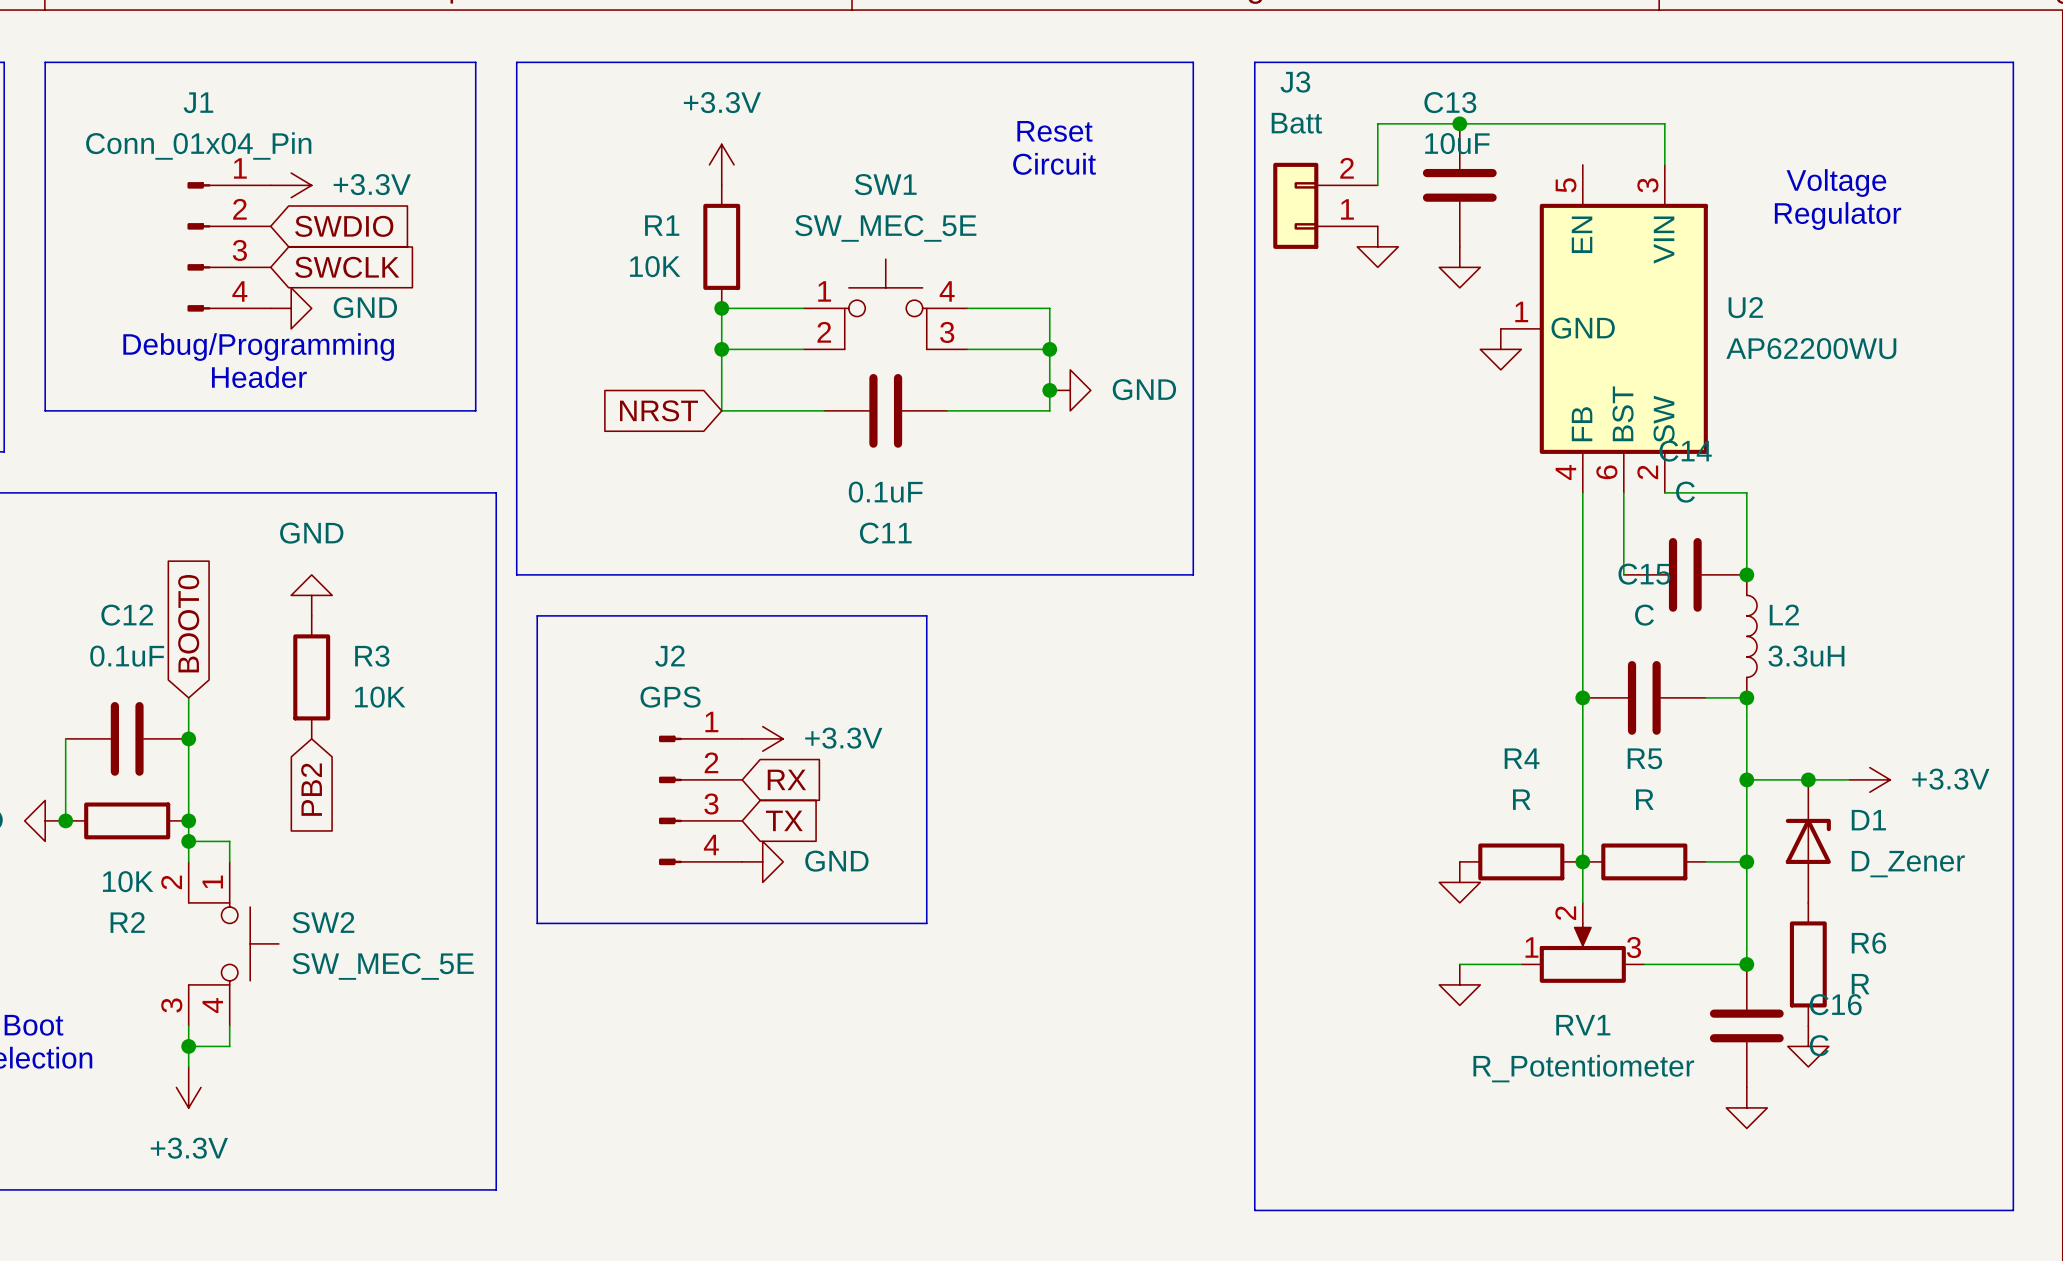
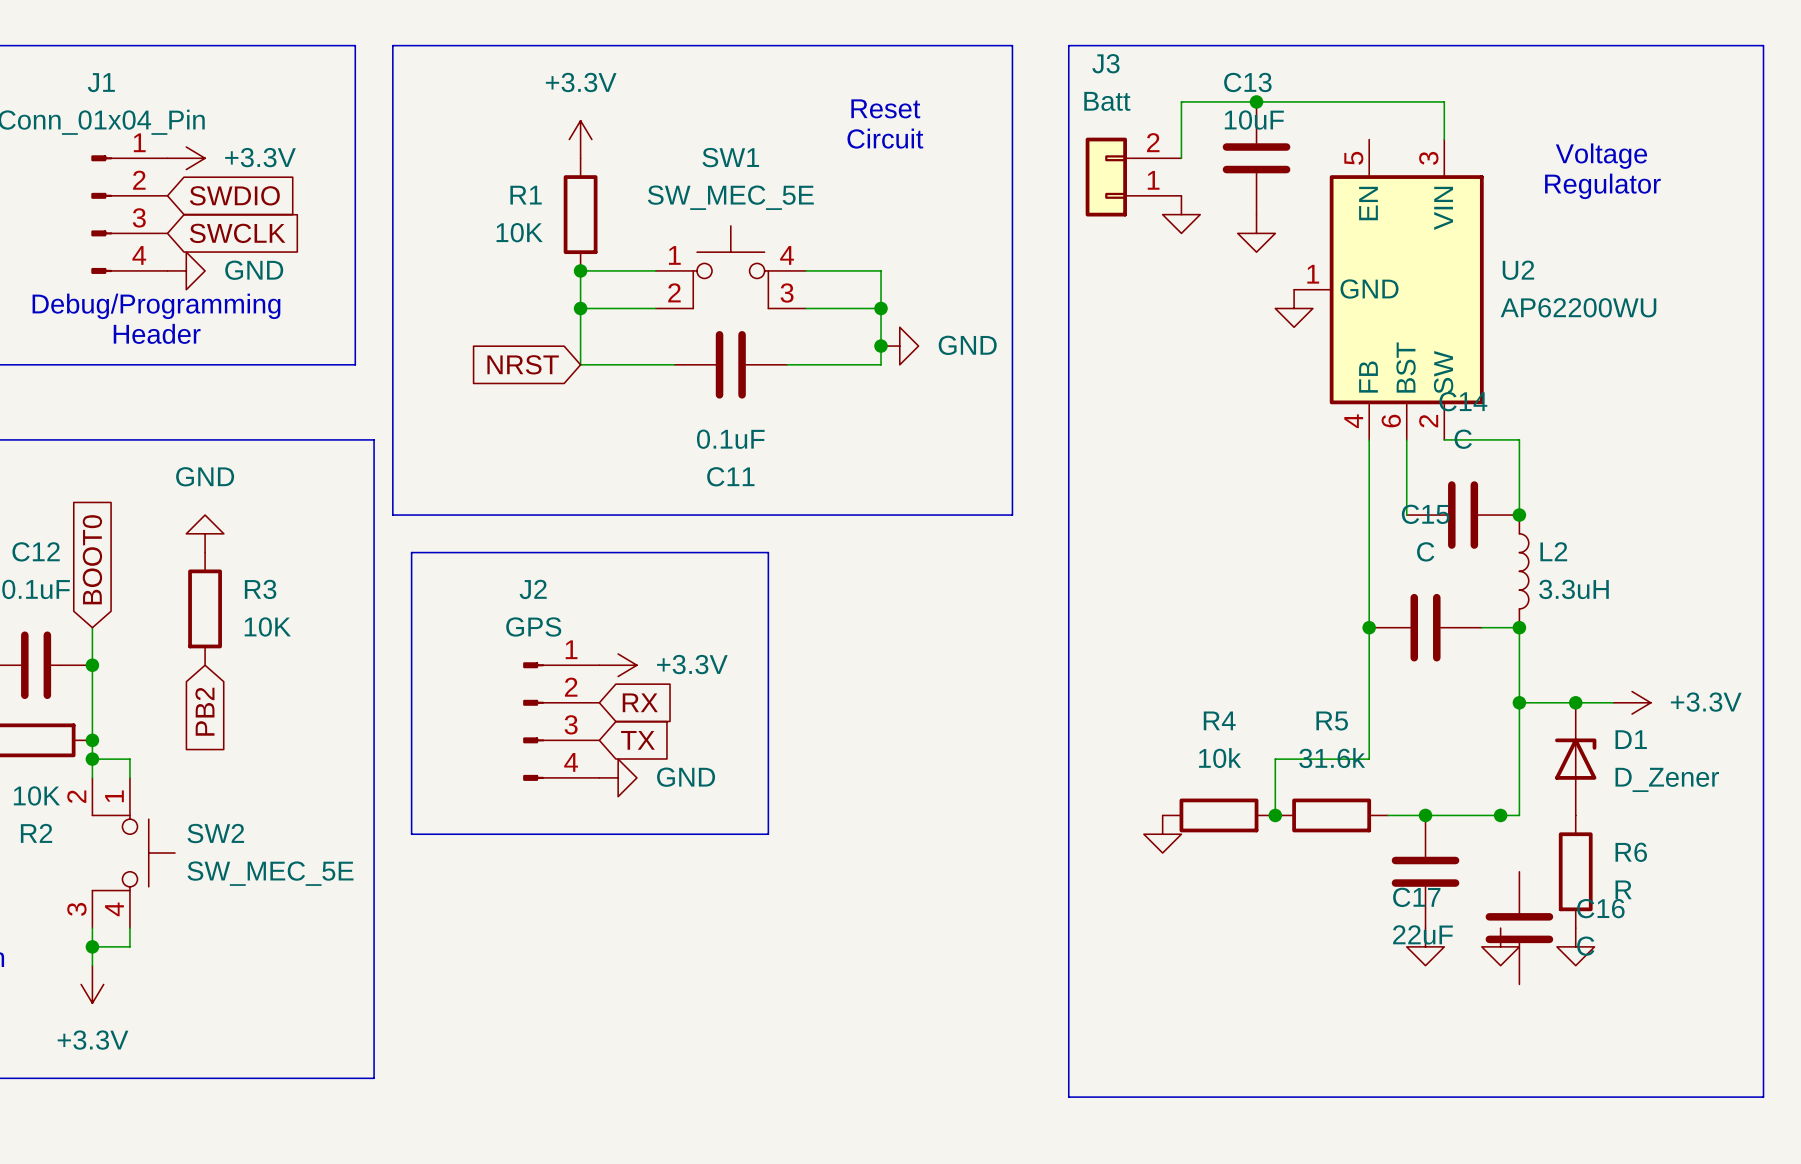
R4 value: R (1521, 799) -> 10k (1220, 758)
R5 value: R (1644, 799) -> 31.6k (1332, 758)
wire: (1582, 841) (1582, 902) -> (1369, 759) (1275, 759) (1275, 815)
R4 position: (1521, 861) -> (1218, 815)
junction: (1582, 861) -> none
R5 position: (1644, 861) -> (1331, 815)
wire: (1705, 861) (1746, 861) -> none
junction: (1746, 861) -> none
power symbol: (1459, 882) -> none
junction: none -> (1275, 815)
junction: none -> (1425, 815)
junction: none -> (1500, 815)
wire: (1746, 902) (1746, 964) (1644, 964) -> (1519, 815) (1387, 815)
power symbol: none -> (1162, 834)
RV1: R_Potentiometer (1582, 942) -> none
wire: (1459, 964) (1521, 964) -> none
C17: none -> 22uF (1425, 871)
junction: (1746, 964) -> none
power symbol: (1459, 984) -> none
power symbol: none -> (1425, 946)
power symbol: none -> (1500, 946)
power symbol: (1746, 1107) -> none

